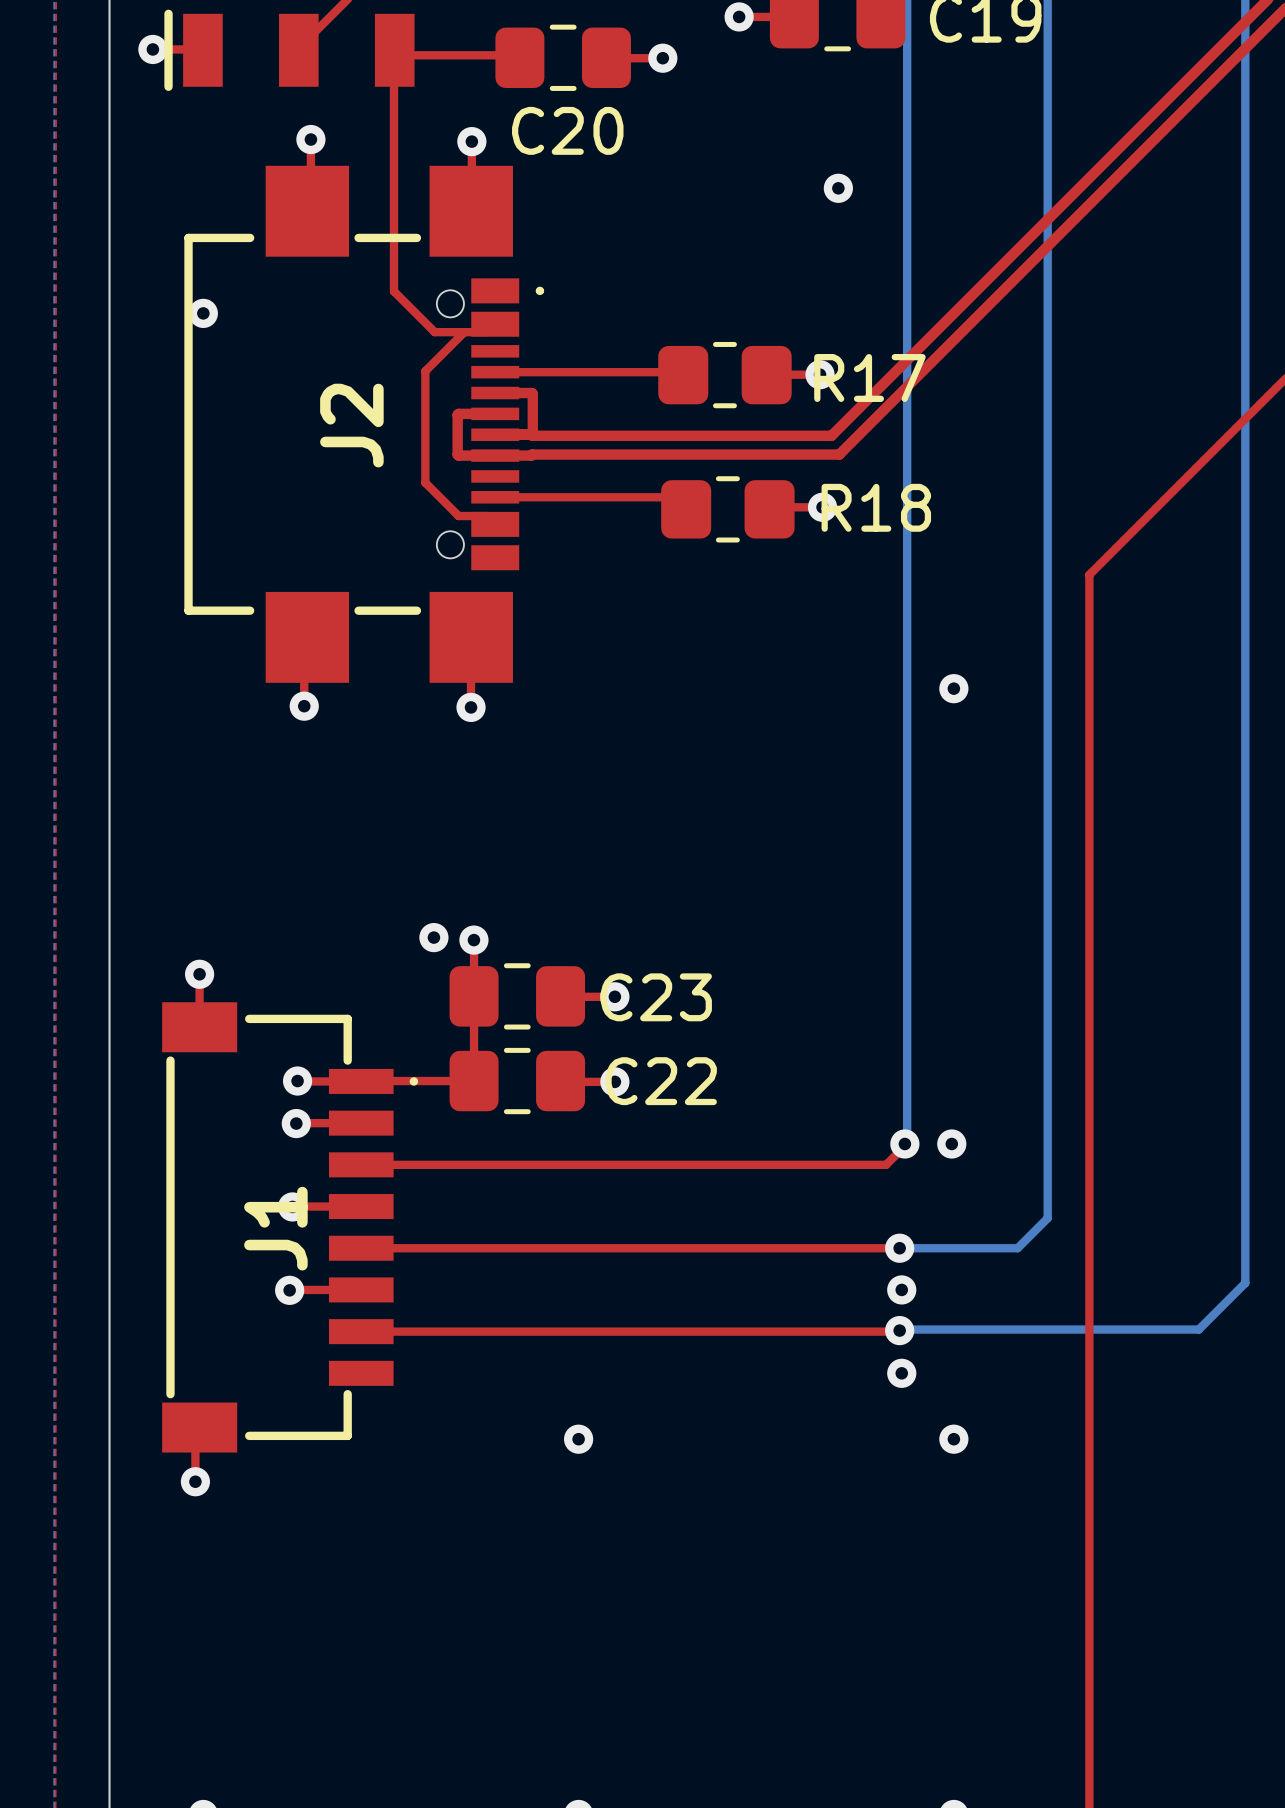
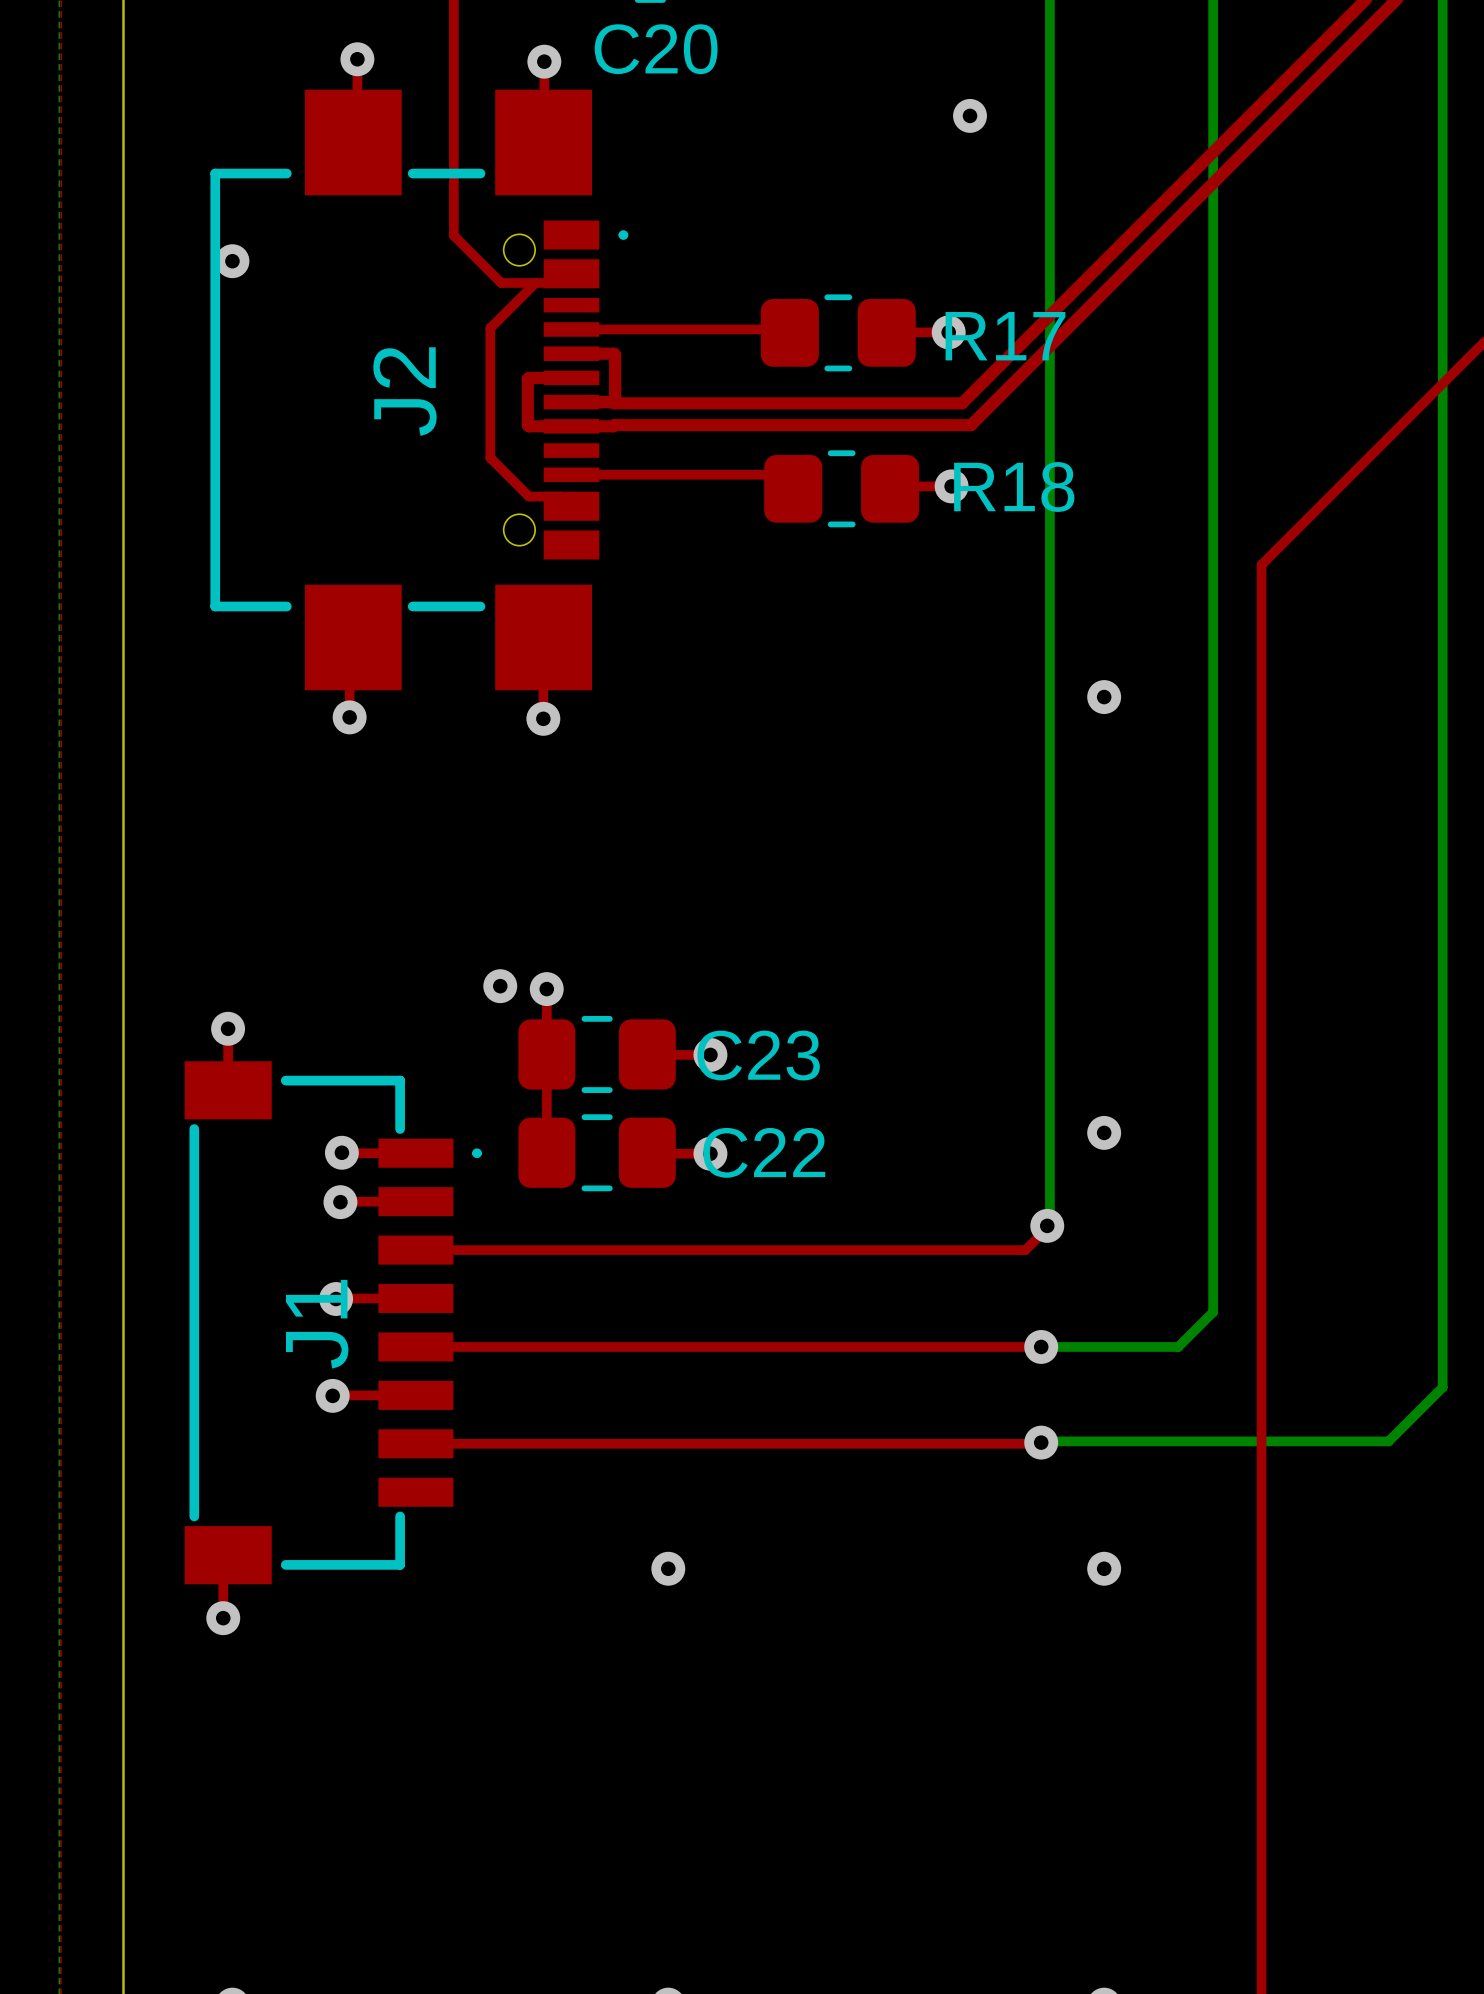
top track: (361, 1081) (474, 1081) -> none
via position: (951, 1143) -> (1104, 1132)
via: (901, 1289) -> none
via: (901, 1373) -> none

